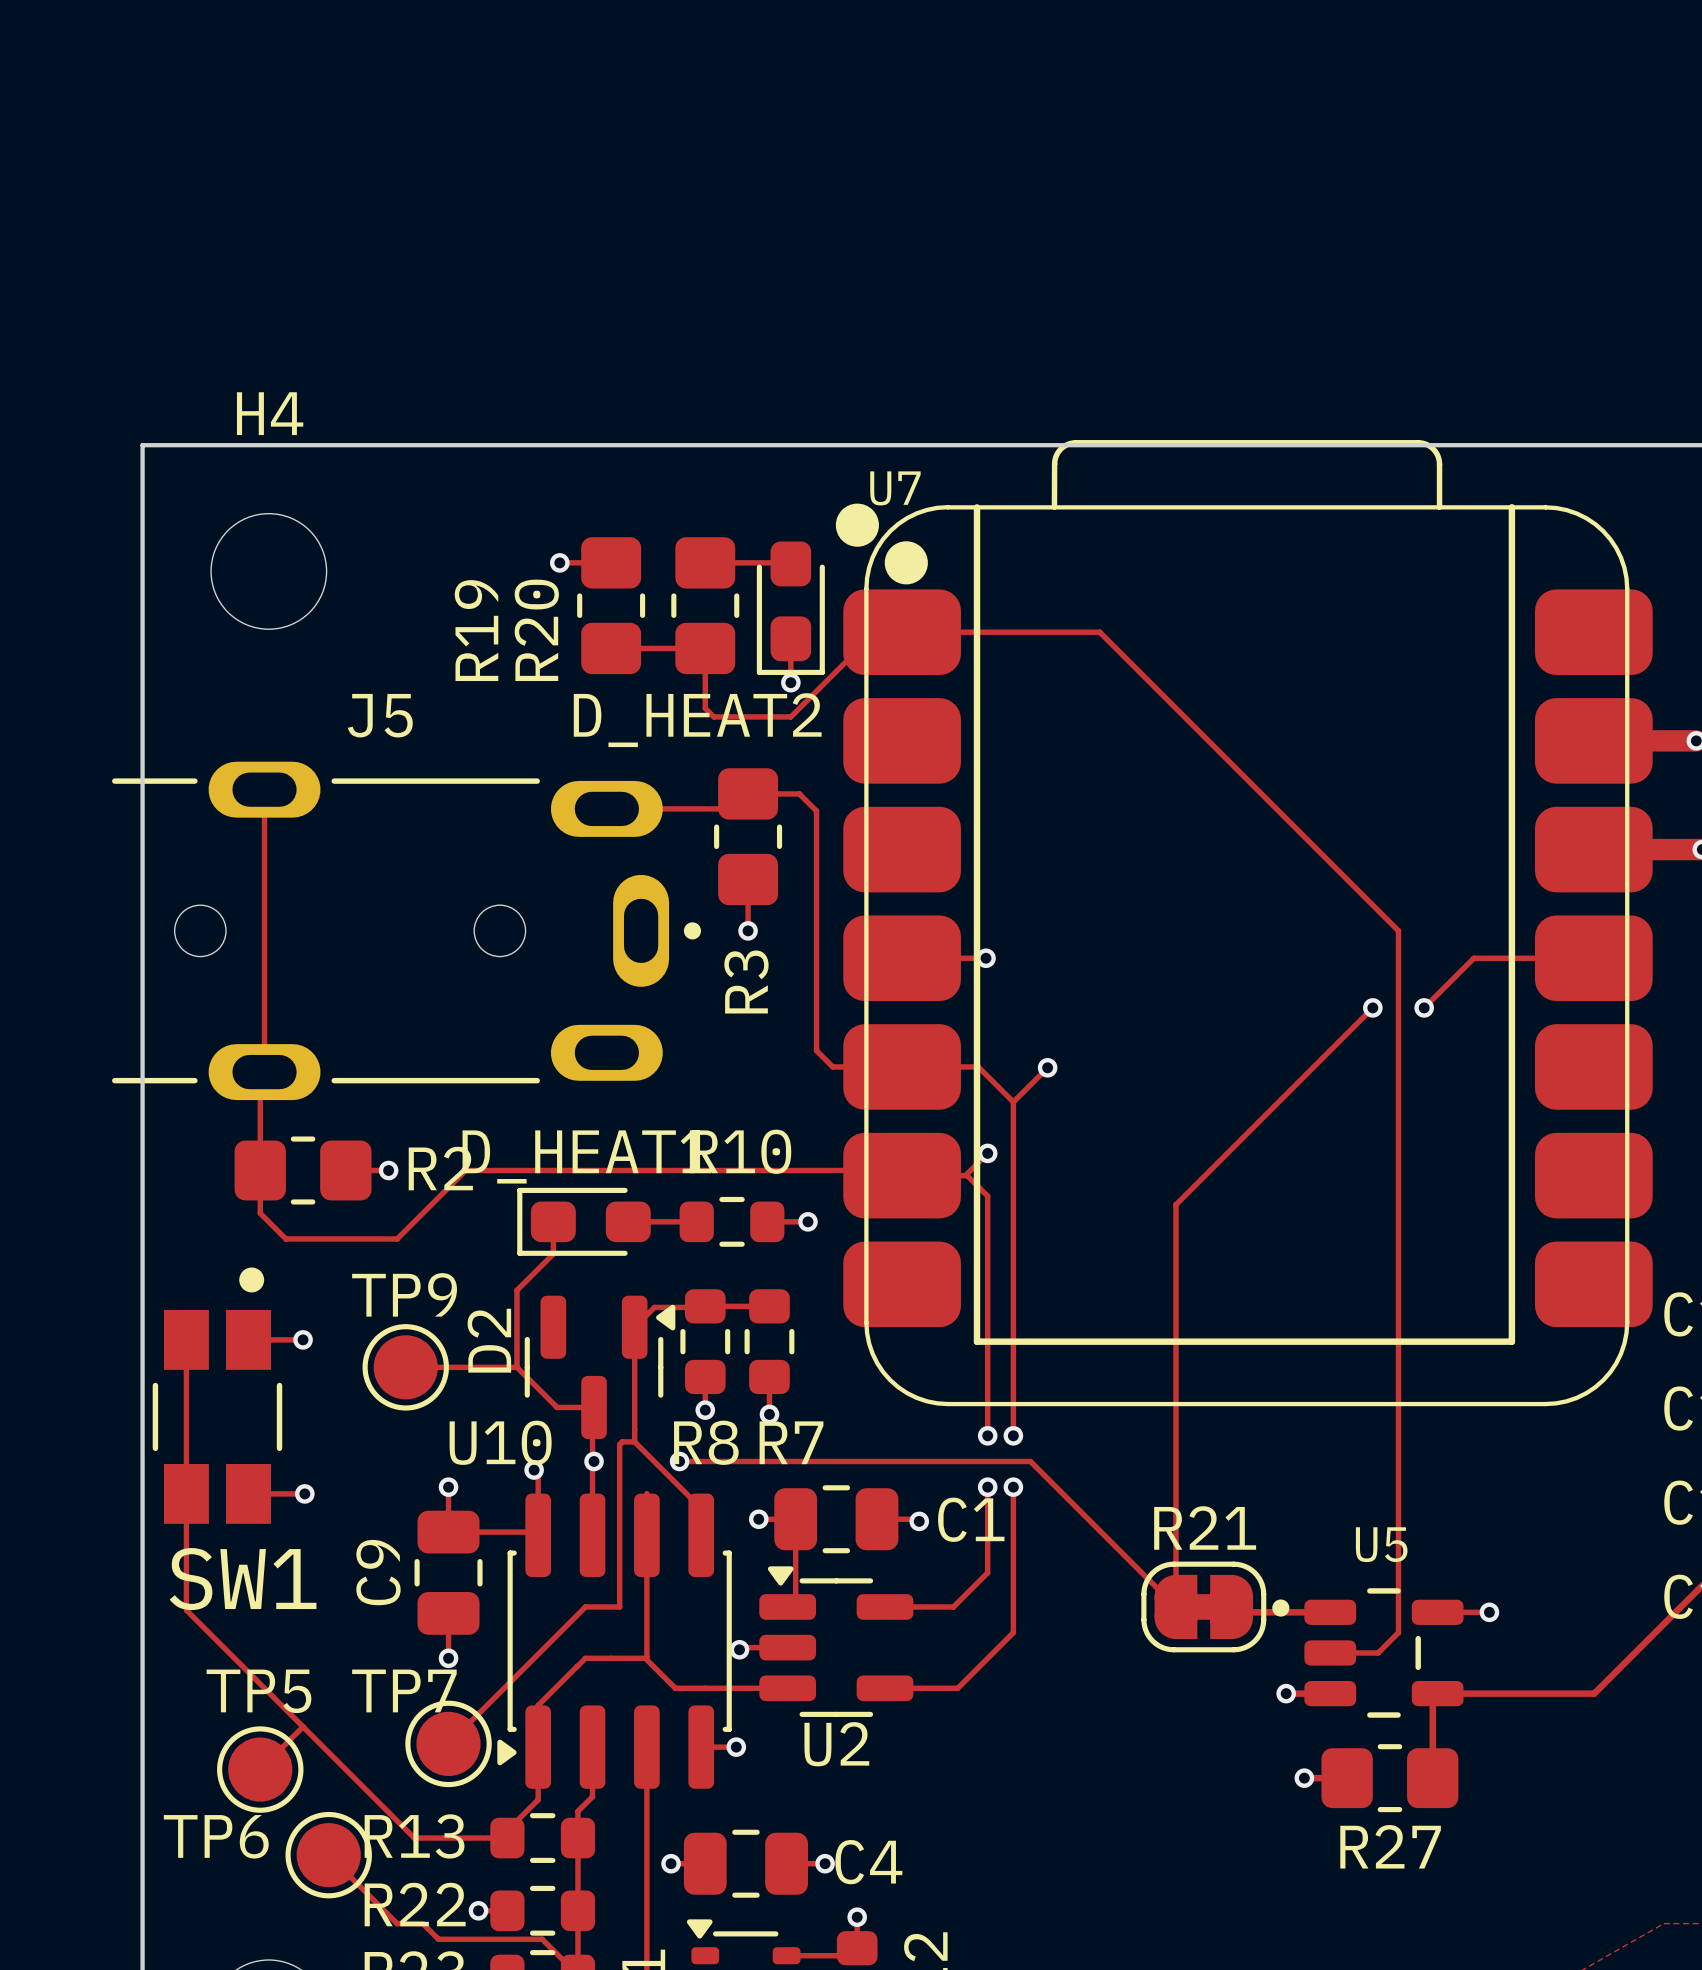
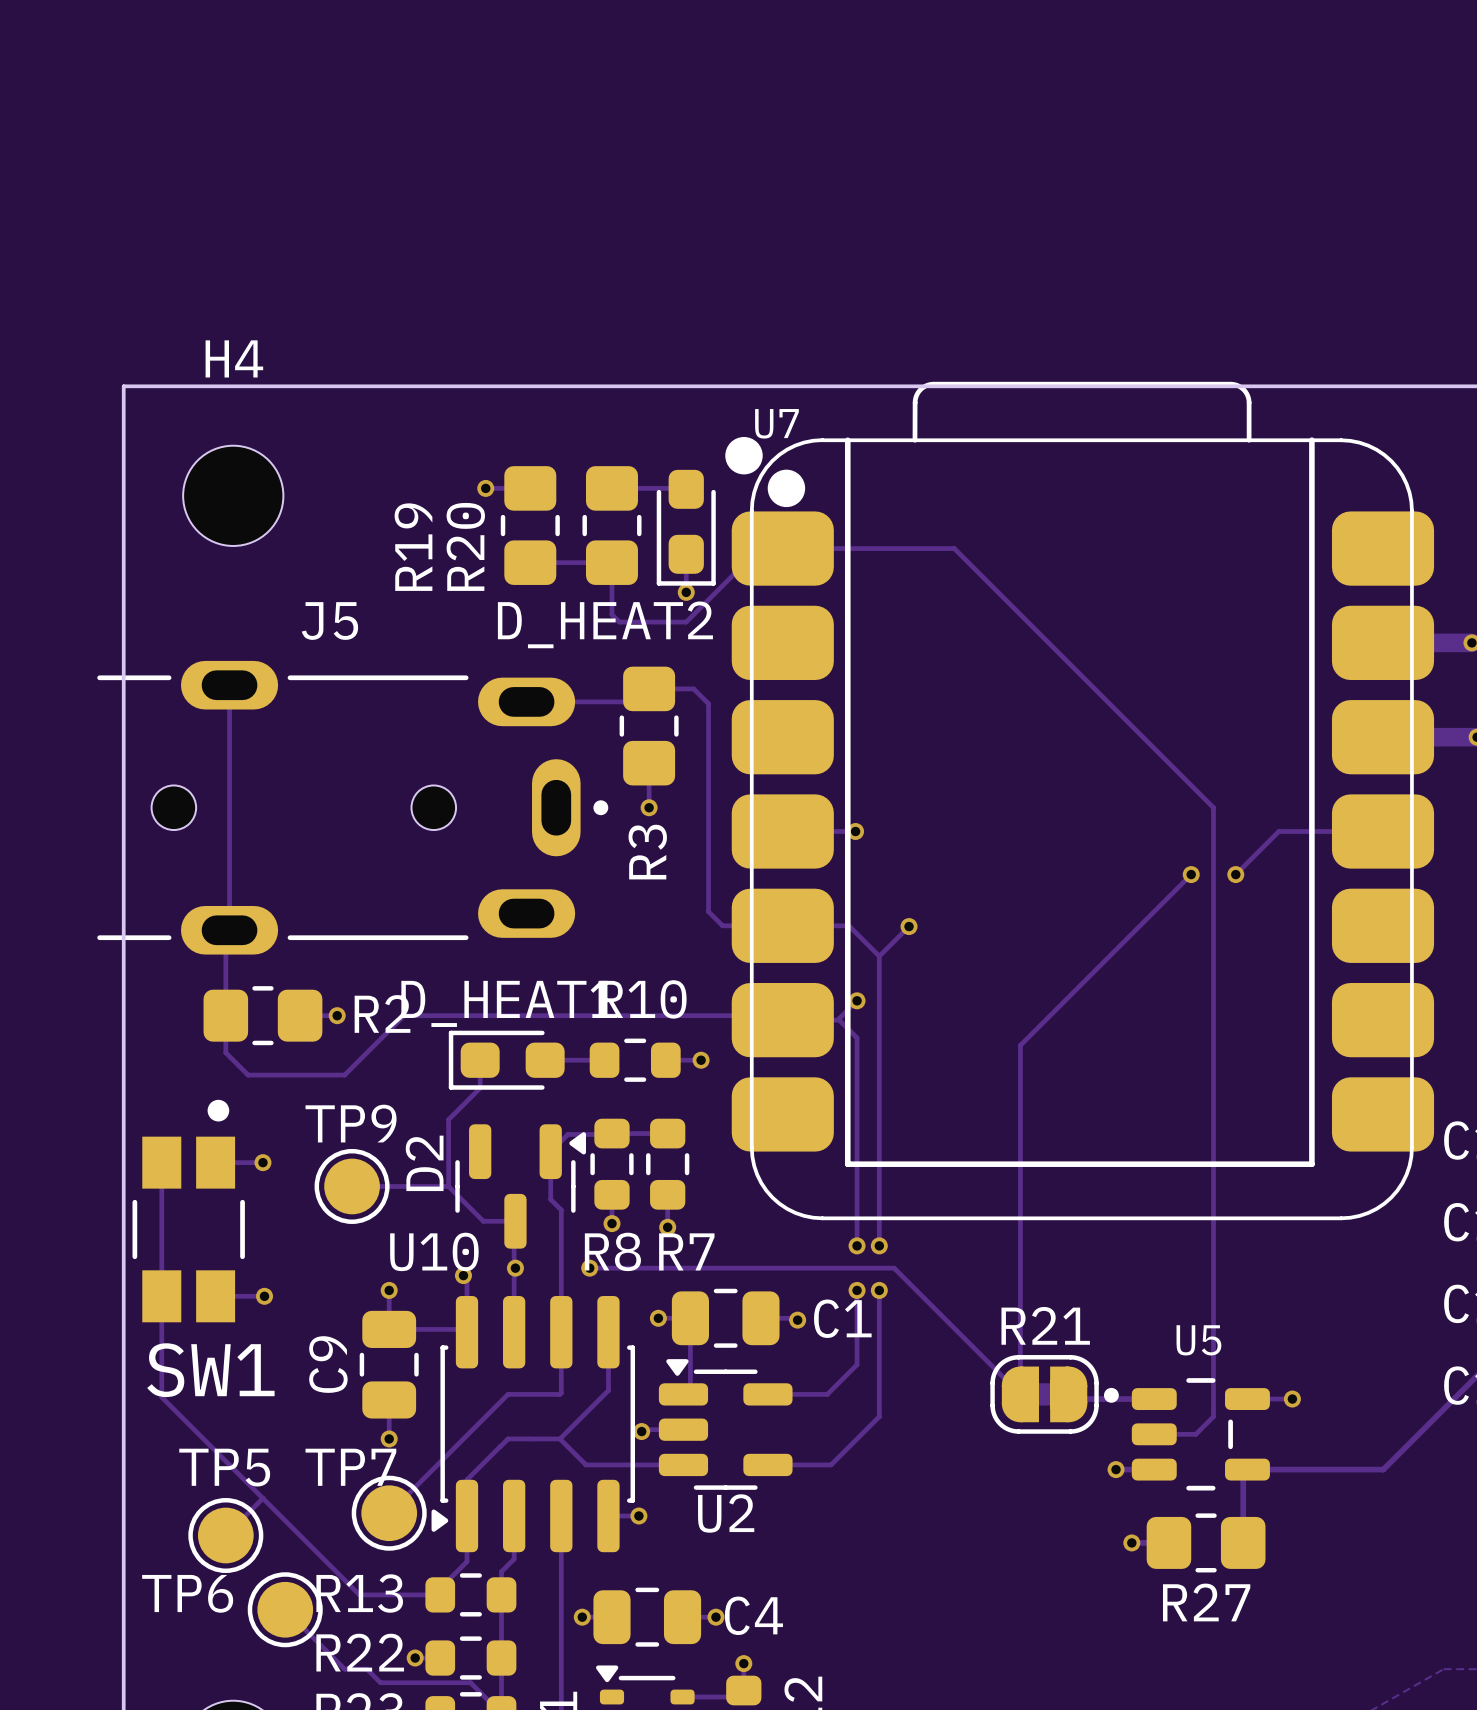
track: (634, 1382) (634, 1441) -> (550, 1199) (561, 1210) (561, 1296)
track: (634, 1441) (701, 1508) (701, 1535) -> (561, 1437) (608, 1390) (608, 1332)
track: (634, 1441) (622, 1441) (619, 1444) (619, 1606) -> none
track: (646, 1605) (646, 1656) -> (561, 1393) (537, 1394)

